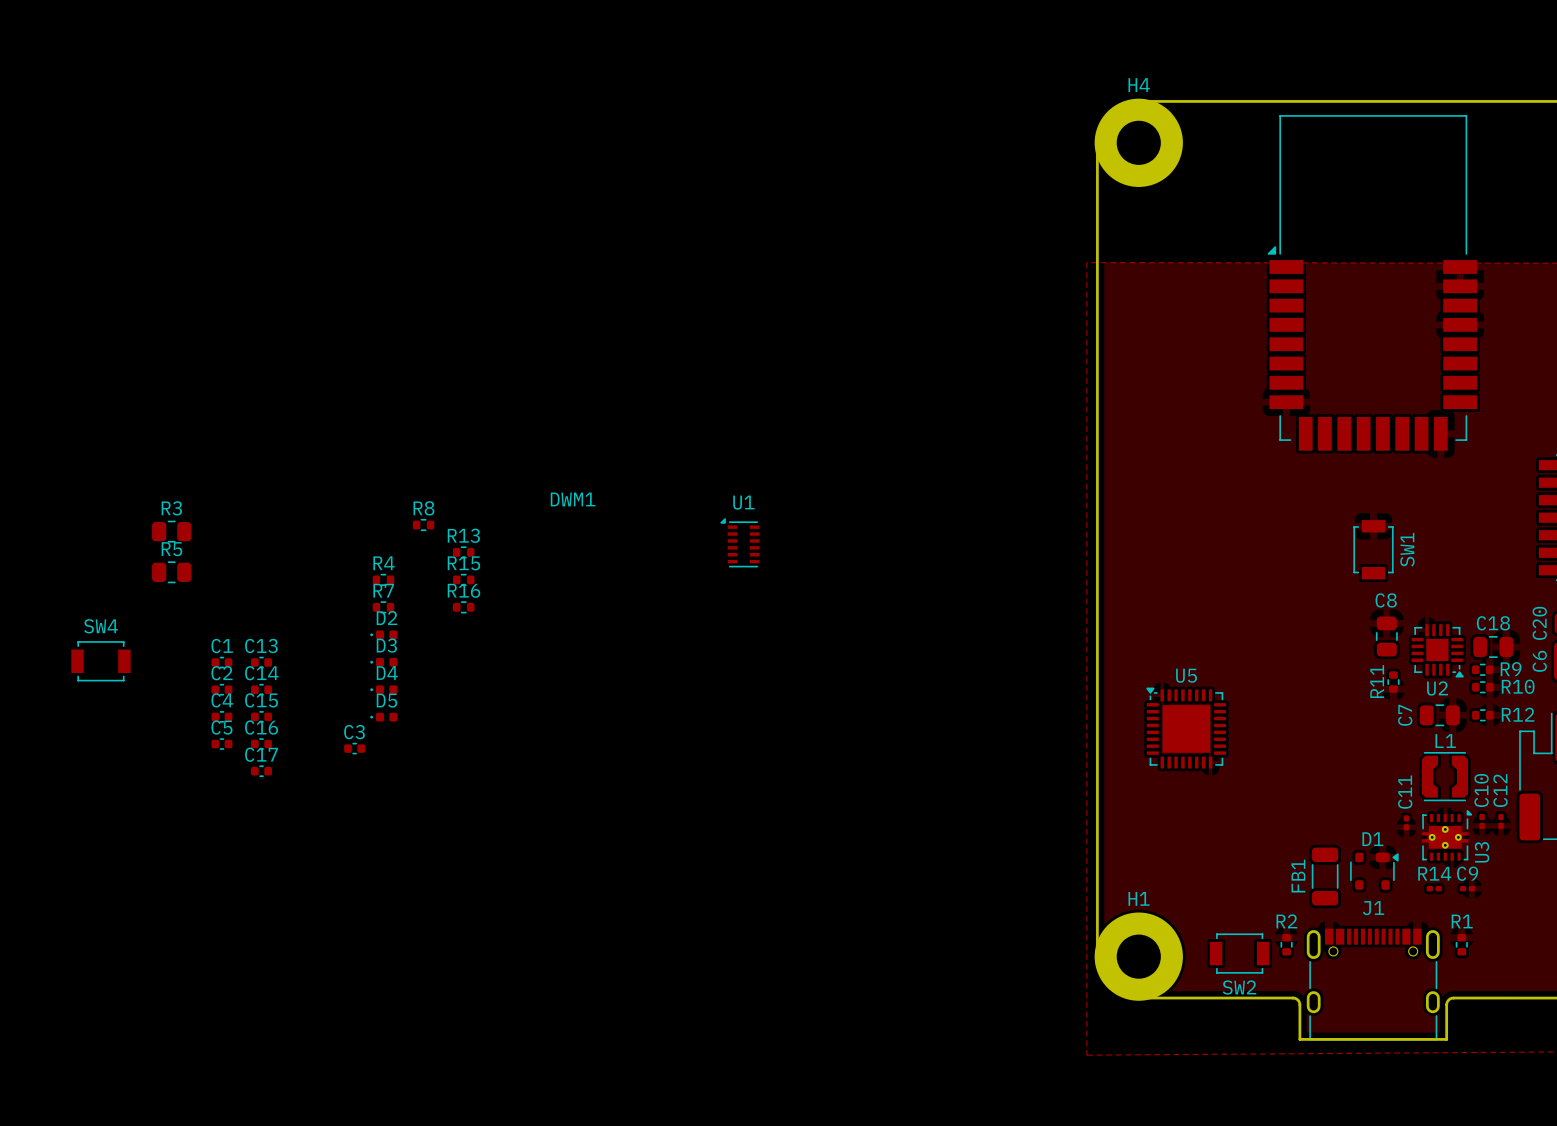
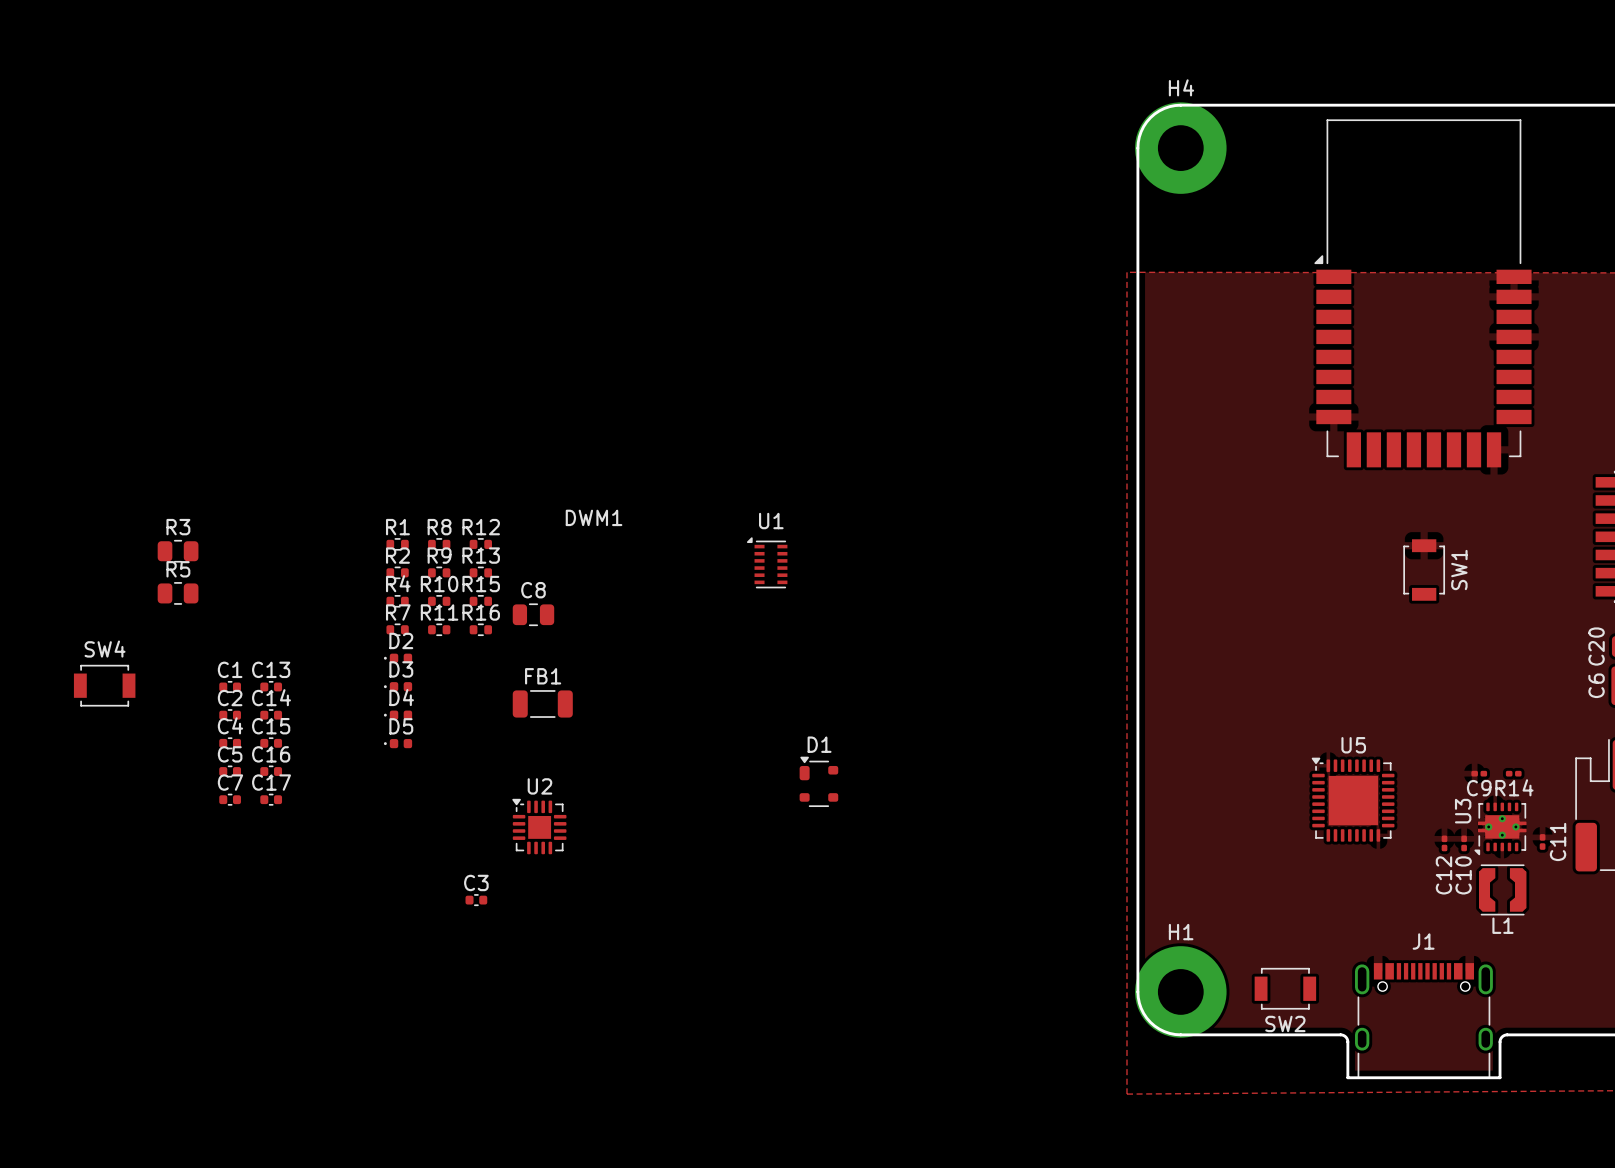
C8 rotation: 0° (1386, 636) -> 90° clockwise (533, 614)
C8 position: (1386, 636) -> (533, 614)
C18: (1493, 646) -> none
U2 rotation: 0° (1437, 650) -> 180° (539, 826)
U2 position: (1437, 650) -> (539, 826)
R9 position: (1482, 669) -> (439, 572)
R9 name position: R9 (1511, 669) -> R9 (439, 555)
R11 rotation: 0° (1393, 682) -> 90° clockwise (439, 629)
R11 position: (1393, 682) -> (439, 629)
R10 name position: R10 (1518, 686) -> R10 (439, 584)
R10 position: (1482, 687) -> (439, 601)
C7 footprint: [1419, 704, 1460, 727] -> [219, 793, 241, 806]
R12 name position: R12 (1518, 714) -> R12 (481, 527)
C7 name position: C7 (1405, 715) -> C7 (230, 782)
R12 position: (1482, 715) -> (480, 544)
U5 position: (1186, 728) -> (1353, 799)
L1 name position: L1 (1445, 741) -> L1 (1502, 925)
C3 position: (354, 748) -> (476, 900)
L1 position: (1444, 776) -> (1502, 889)
C10 name position: C10 (1481, 790) -> C10 (1463, 875)
C12 name position: C12 (1500, 790) -> C12 (1443, 875)
C11 name position: C11 (1405, 792) -> C11 (1558, 841)
C10 position: (1482, 821) -> (1464, 843)
C12 position: (1501, 821) -> (1444, 843)
C11 position: (1406, 822) -> (1542, 841)
U3 rotation: 0° (1446, 835) -> 180° (1500, 828)
U3 position: (1446, 835) -> (1500, 828)
D1 rotation: 0° (1374, 871) -> 90° counterclockwise (818, 781)
D1 position: (1374, 871) -> (818, 781)
R14 name position: R14 (1434, 873) -> R14 (1514, 787)
C9 name position: C9 (1467, 873) -> C9 (1479, 788)
FB1 rotation: 0° (1325, 876) -> 90° clockwise (542, 703)
FB1 position: (1325, 876) -> (542, 703)
R14 position: (1434, 888) -> (1513, 773)
C9 position: (1467, 888) -> (1479, 773)
R2 rotation: 0° (1286, 944) -> 90° clockwise (397, 572)
R2 position: (1286, 944) -> (397, 572)
R1 rotation: 0° (1461, 944) -> 90° clockwise (397, 544)
R1 position: (1461, 944) -> (397, 544)

